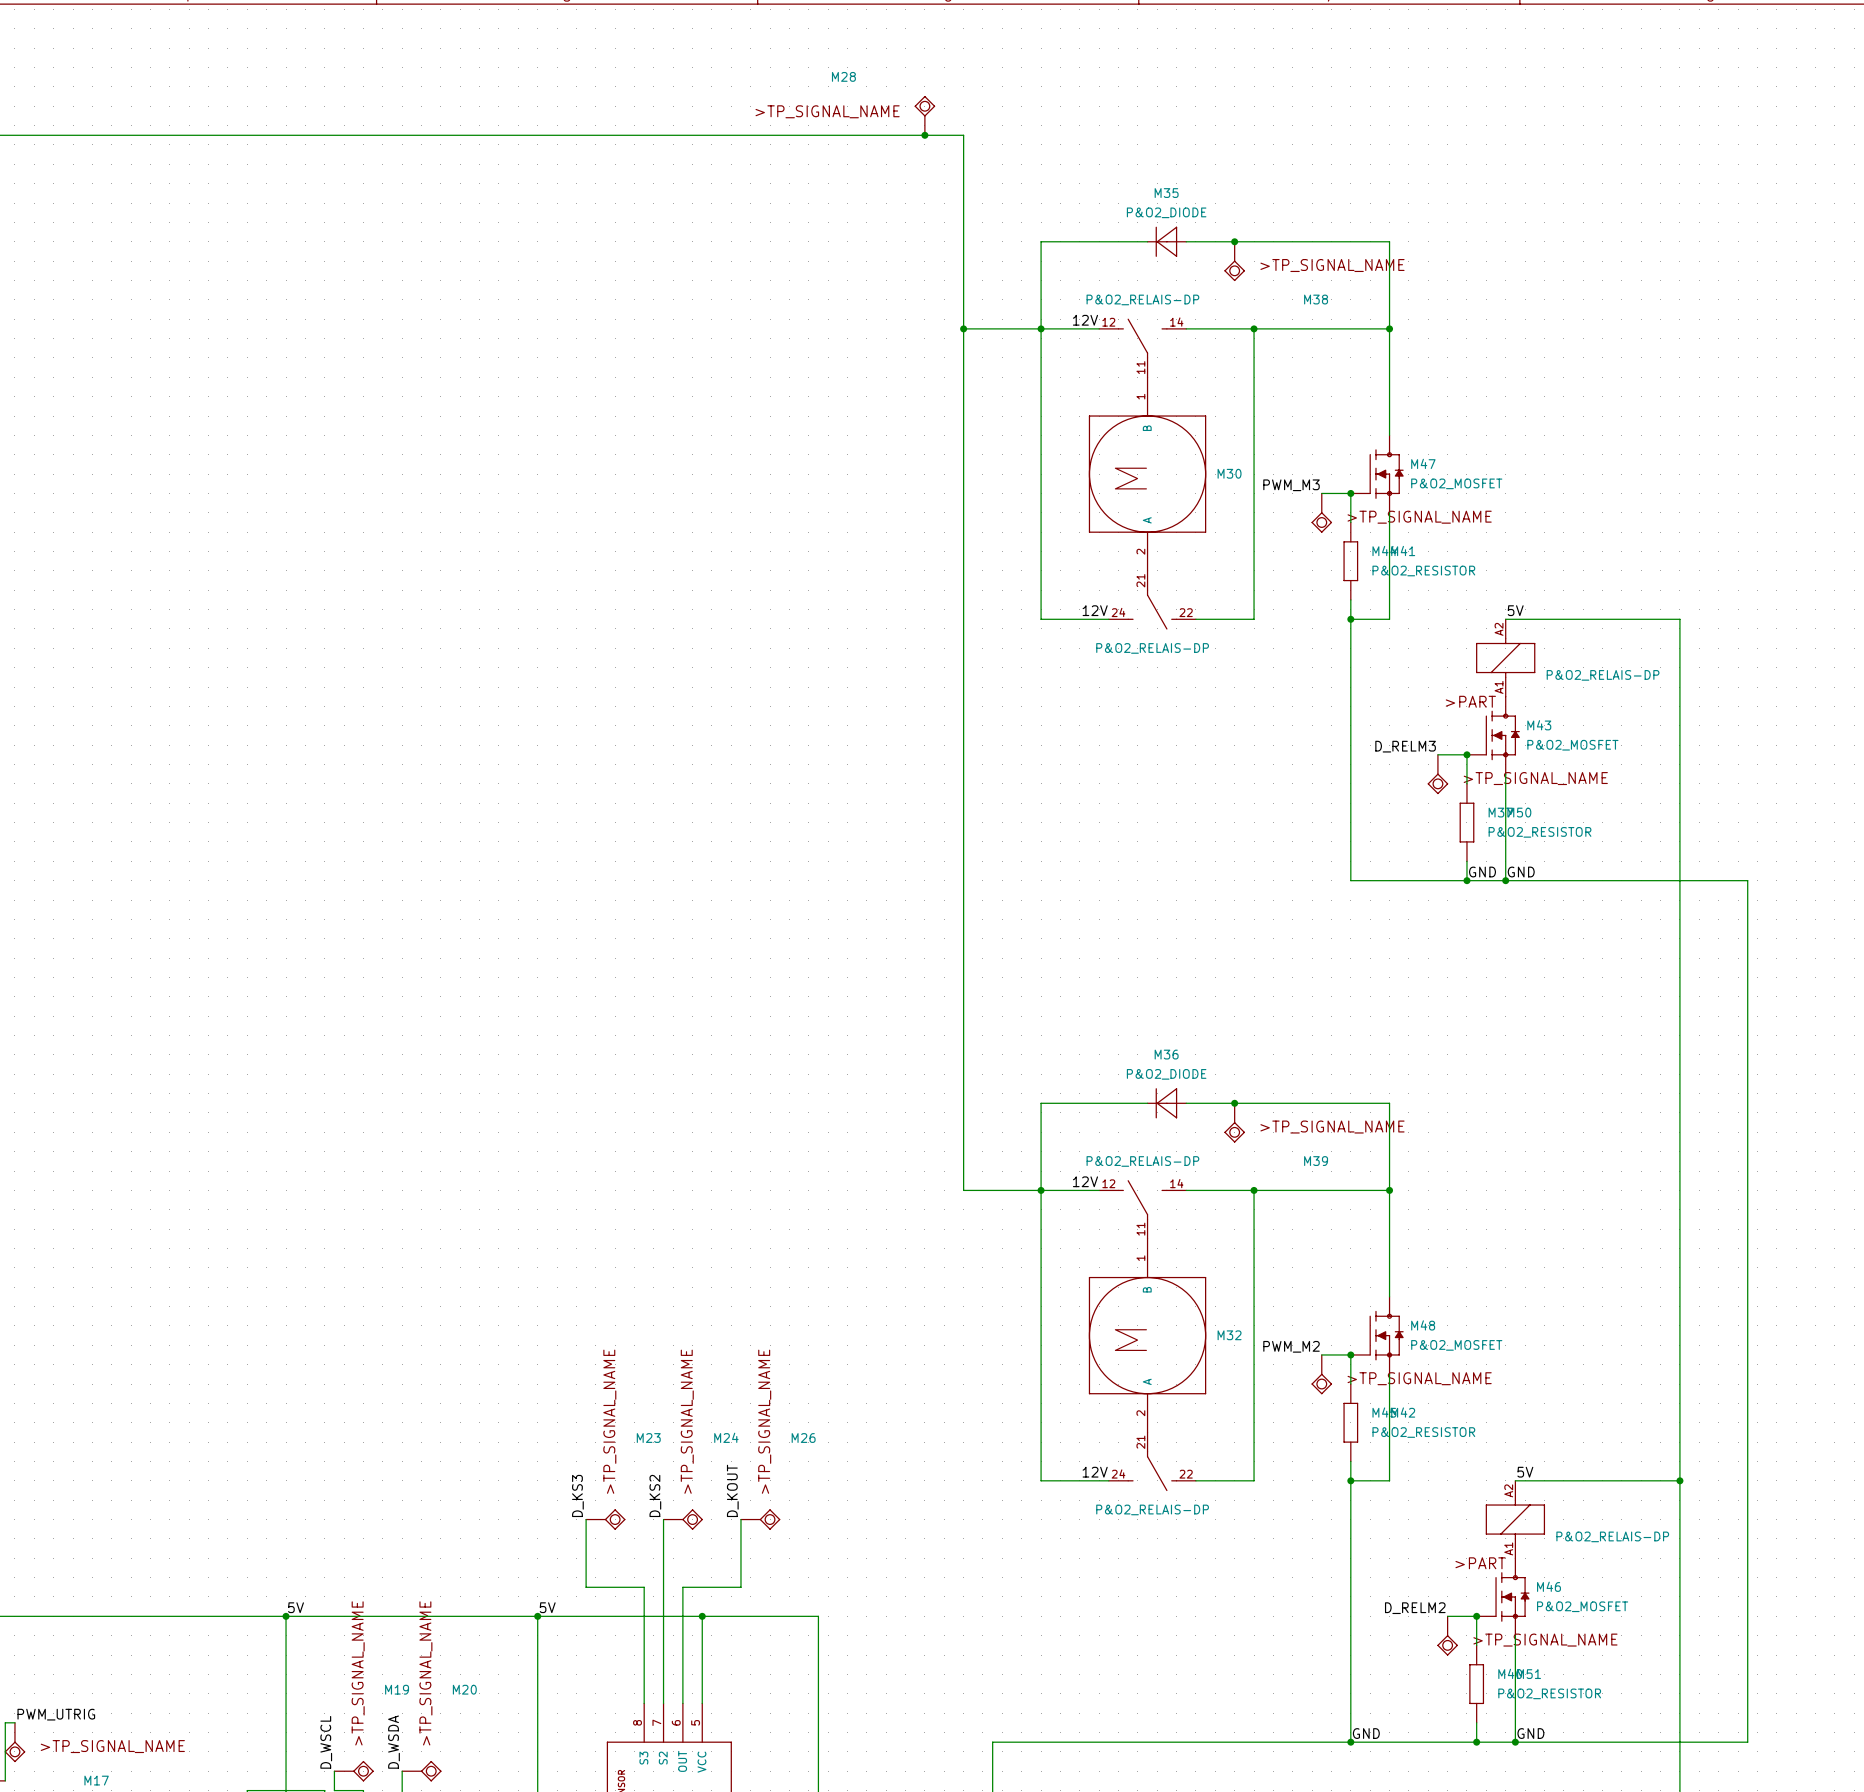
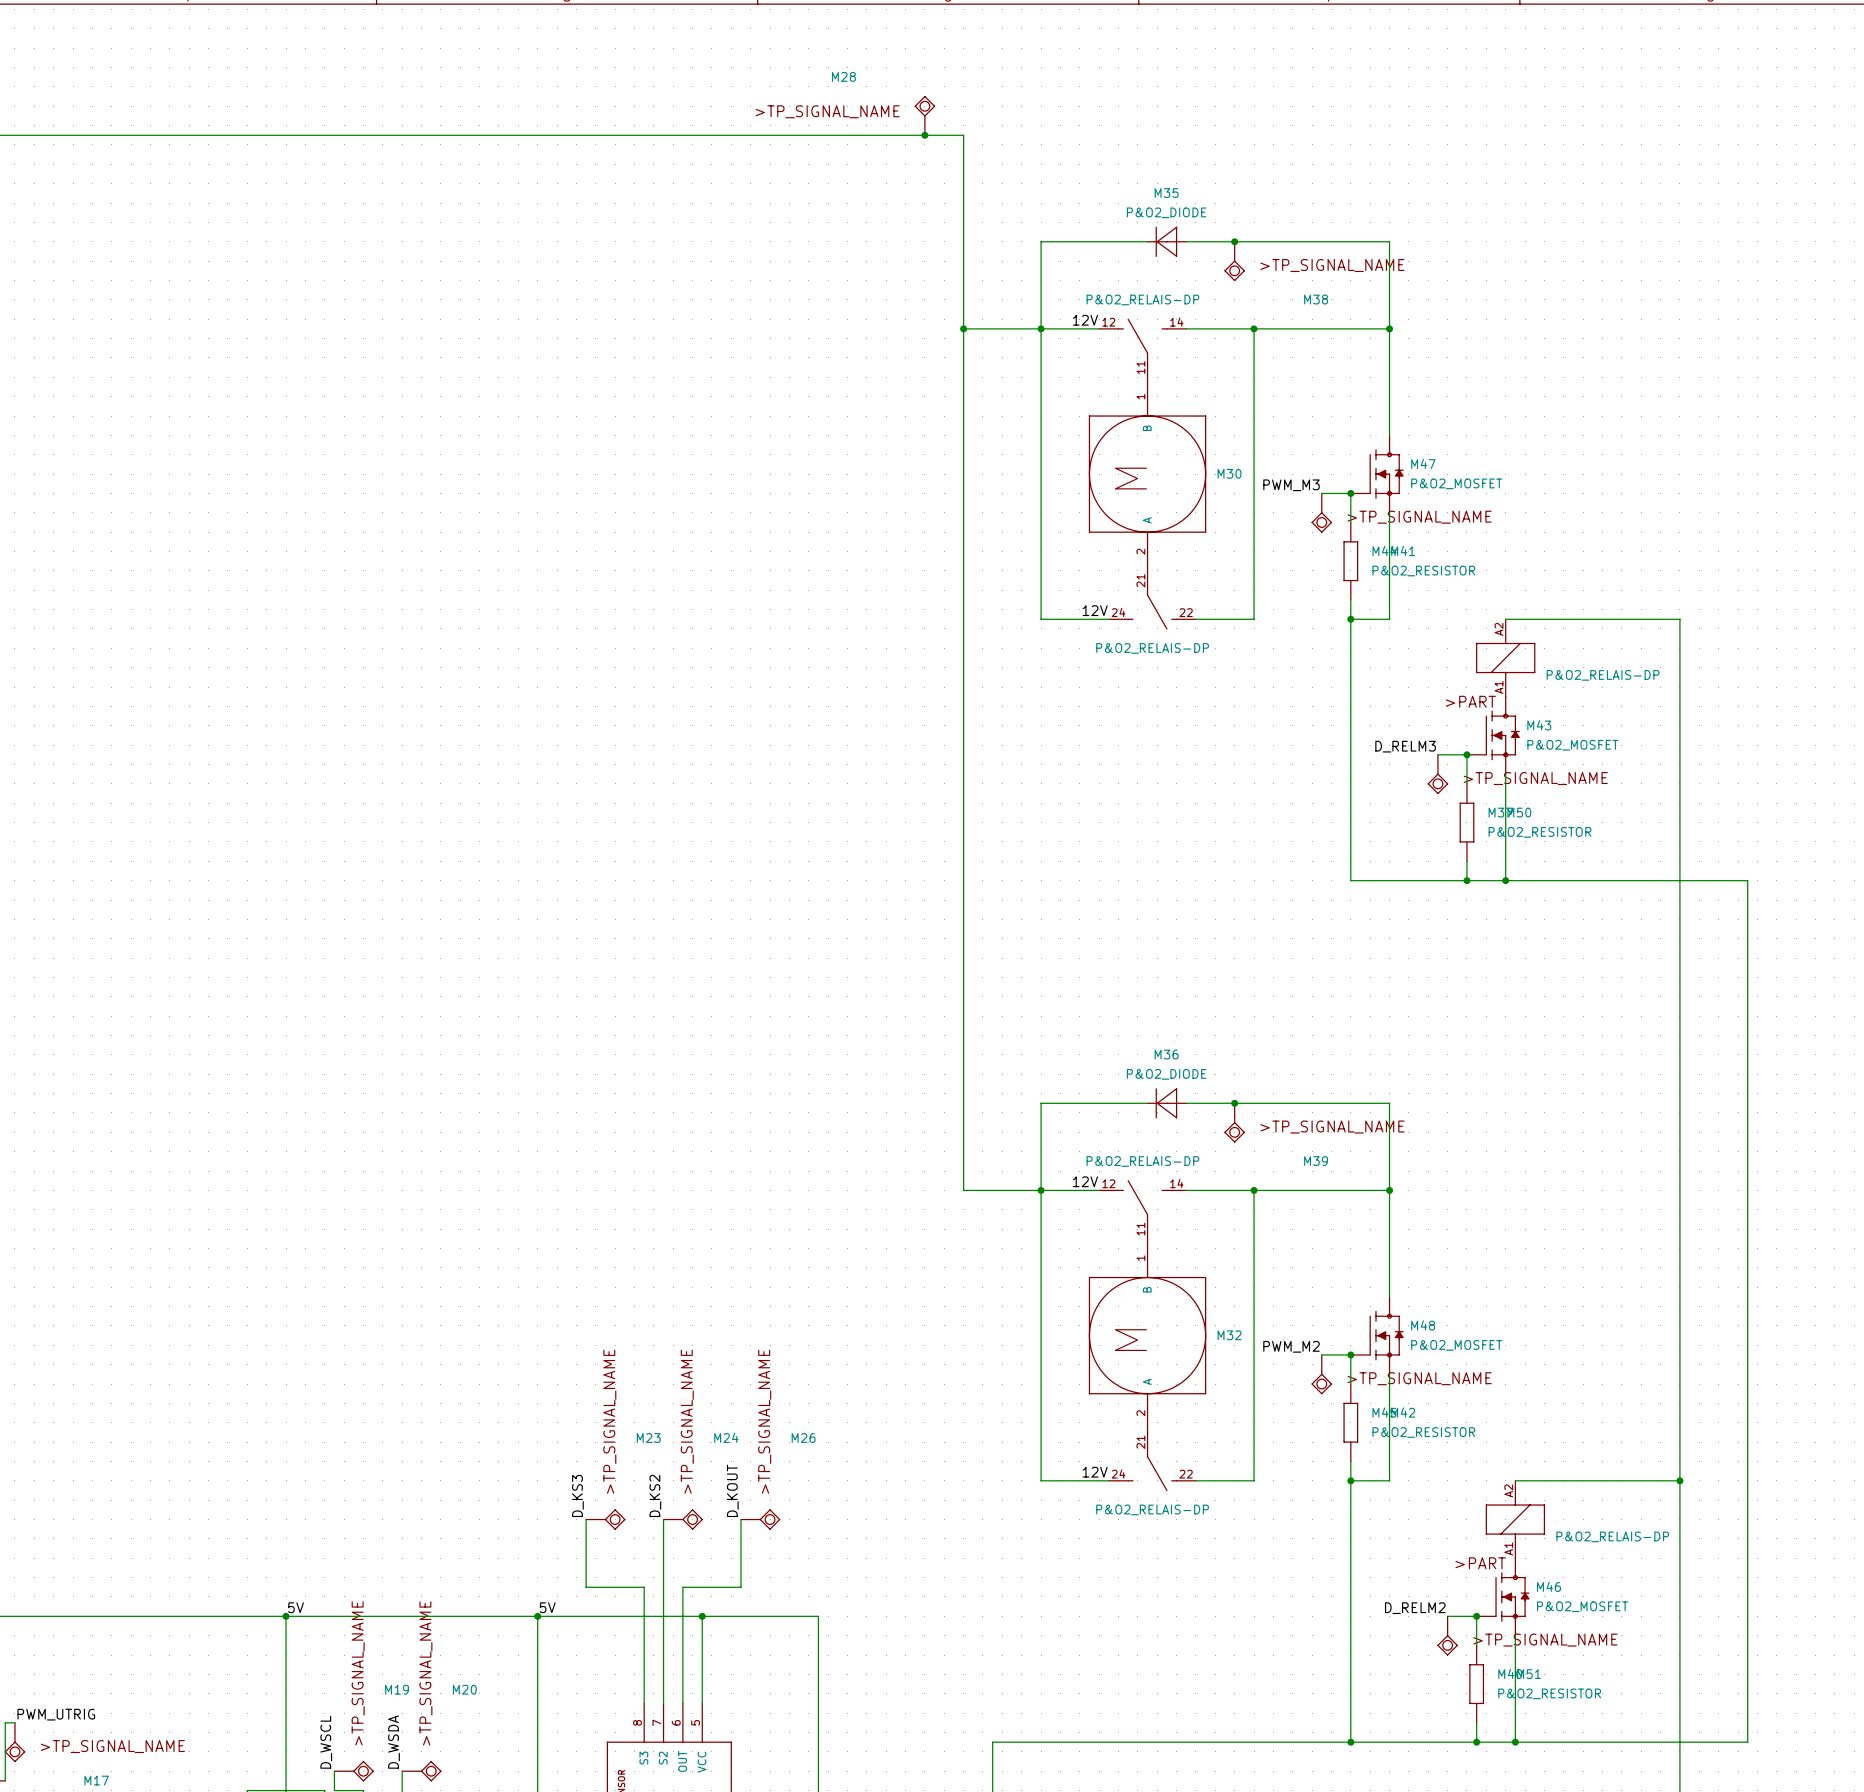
label: 5V (1515, 610) -> none
label: GND (1482, 872) -> none
label: GND (1521, 872) -> none
label: 5V (1525, 1472) -> none
label: GND (1366, 1733) -> none
label: GND (1530, 1733) -> none

